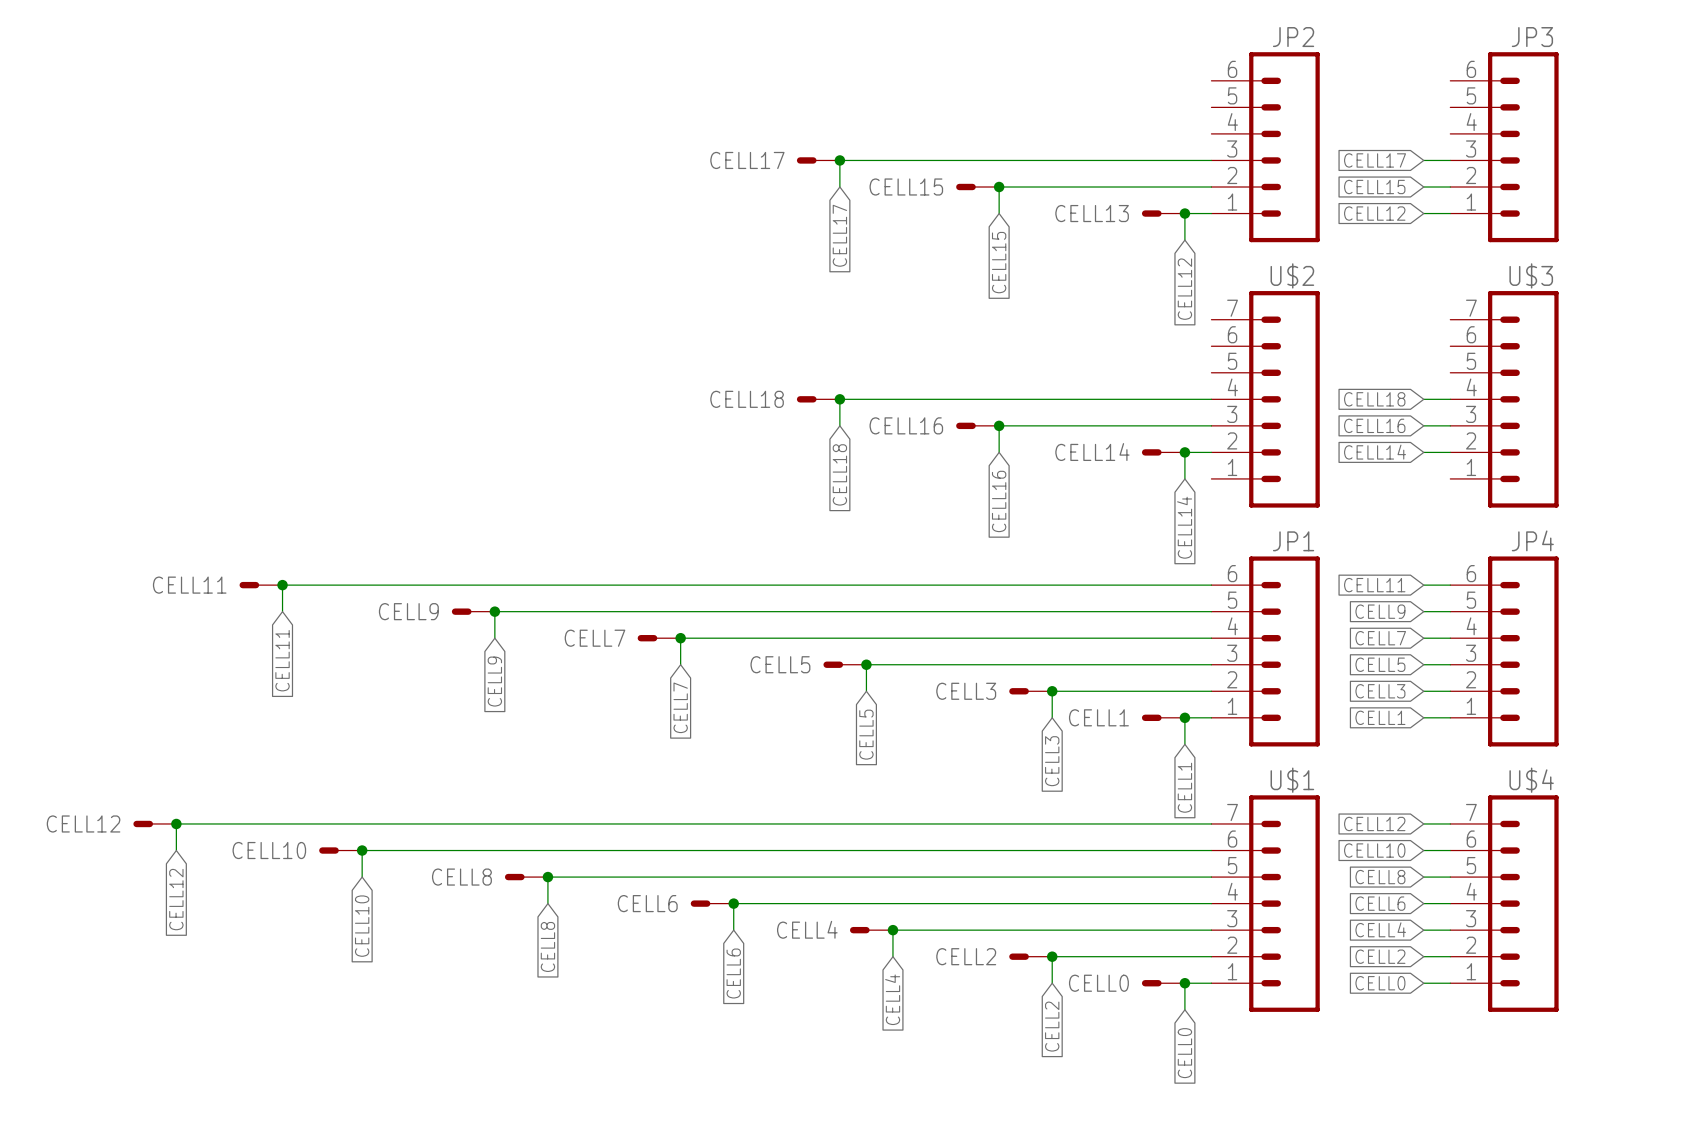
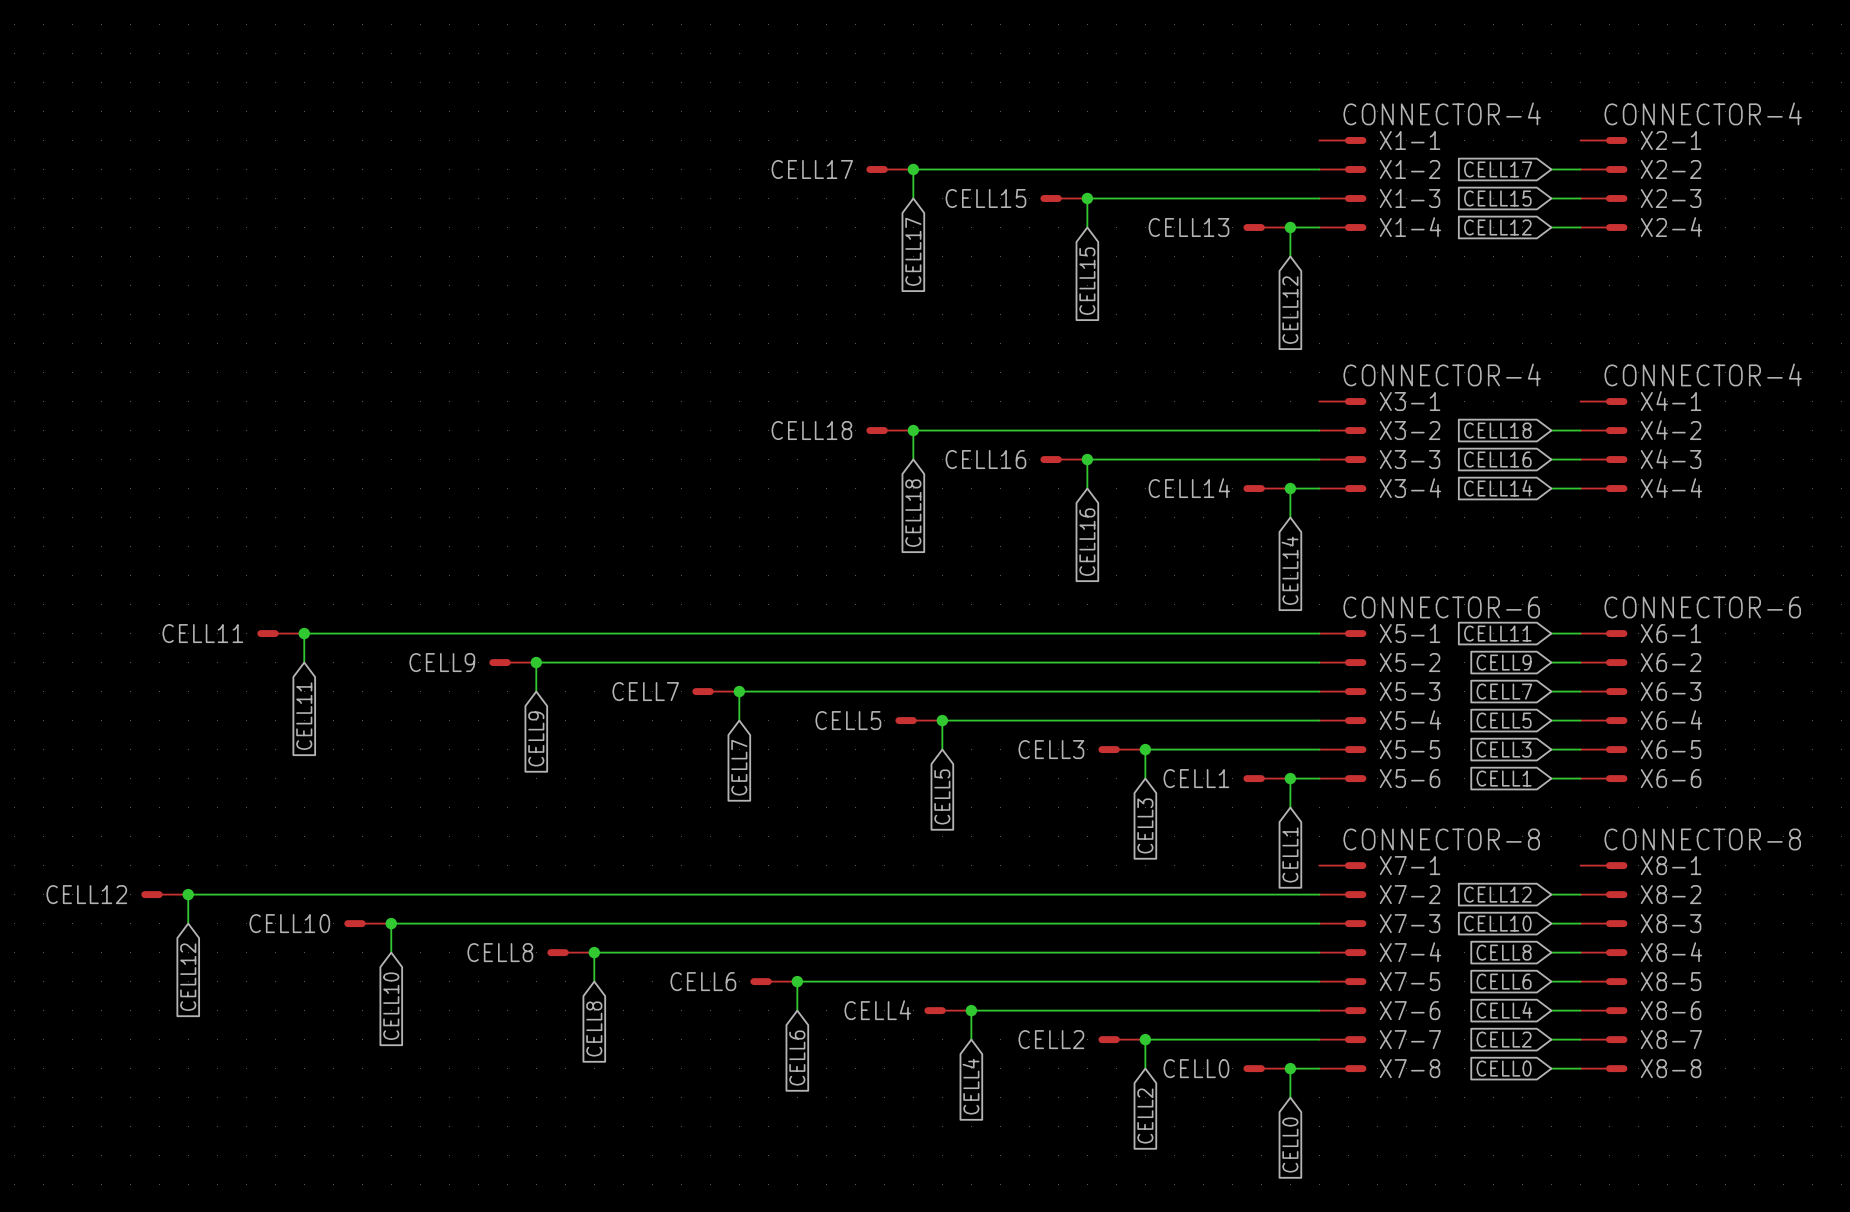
X1-1: none -> CONNECTOR-4 (1342, 140)
X2-1: none -> CONNECTOR-4 (1603, 140)
JP2: (1265, 147) -> none
JP3: (1504, 147) -> none
X1-2: none -> (1342, 169)
X2-2: none -> (1603, 169)
X1-3: none -> (1342, 198)
X2-3: none -> (1603, 198)
X1-4: none -> (1342, 227)
X2-4: none -> (1603, 227)
X3-1: none -> CONNECTOR-4 (1342, 401)
X4-1: none -> CONNECTOR-4 (1603, 401)
X3-2: none -> (1342, 430)
U$2: (1265, 399) -> none
X4-2: none -> (1603, 430)
U$3: (1504, 399) -> none
X3-3: none -> (1342, 459)
X4-3: none -> (1603, 459)
X3-4: none -> (1342, 488)
X4-4: none -> (1603, 488)
X5-1: none -> CONNECTOR-6 (1342, 633)
X6-1: none -> CONNECTOR-6 (1603, 633)
X5-2: none -> (1342, 662)
X6-2: none -> (1603, 662)
X5-3: none -> (1342, 691)
X6-3: none -> (1603, 691)
JP1: (1265, 651) -> none
JP4: (1504, 651) -> none
X5-4: none -> (1342, 720)
X6-4: none -> (1603, 720)
X5-5: none -> (1342, 749)
X6-5: none -> (1603, 749)
X5-6: none -> (1342, 778)
X6-6: none -> (1603, 778)
X7-1: none -> CONNECTOR-8 (1342, 865)
X8-1: none -> CONNECTOR-8 (1603, 865)
X7-2: none -> (1342, 894)
X8-2: none -> (1603, 894)
X7-3: none -> (1342, 923)
X8-3: none -> (1603, 923)
X7-4: none -> (1342, 952)
X8-4: none -> (1603, 952)
X7-5: none -> (1342, 981)
U$1: (1265, 903) -> none
X8-5: none -> (1603, 981)
U$4: (1504, 903) -> none
X7-6: none -> (1342, 1010)
X8-6: none -> (1603, 1010)
X7-7: none -> (1342, 1039)
X8-7: none -> (1603, 1039)
X7-8: none -> (1342, 1068)
X8-8: none -> (1603, 1068)

